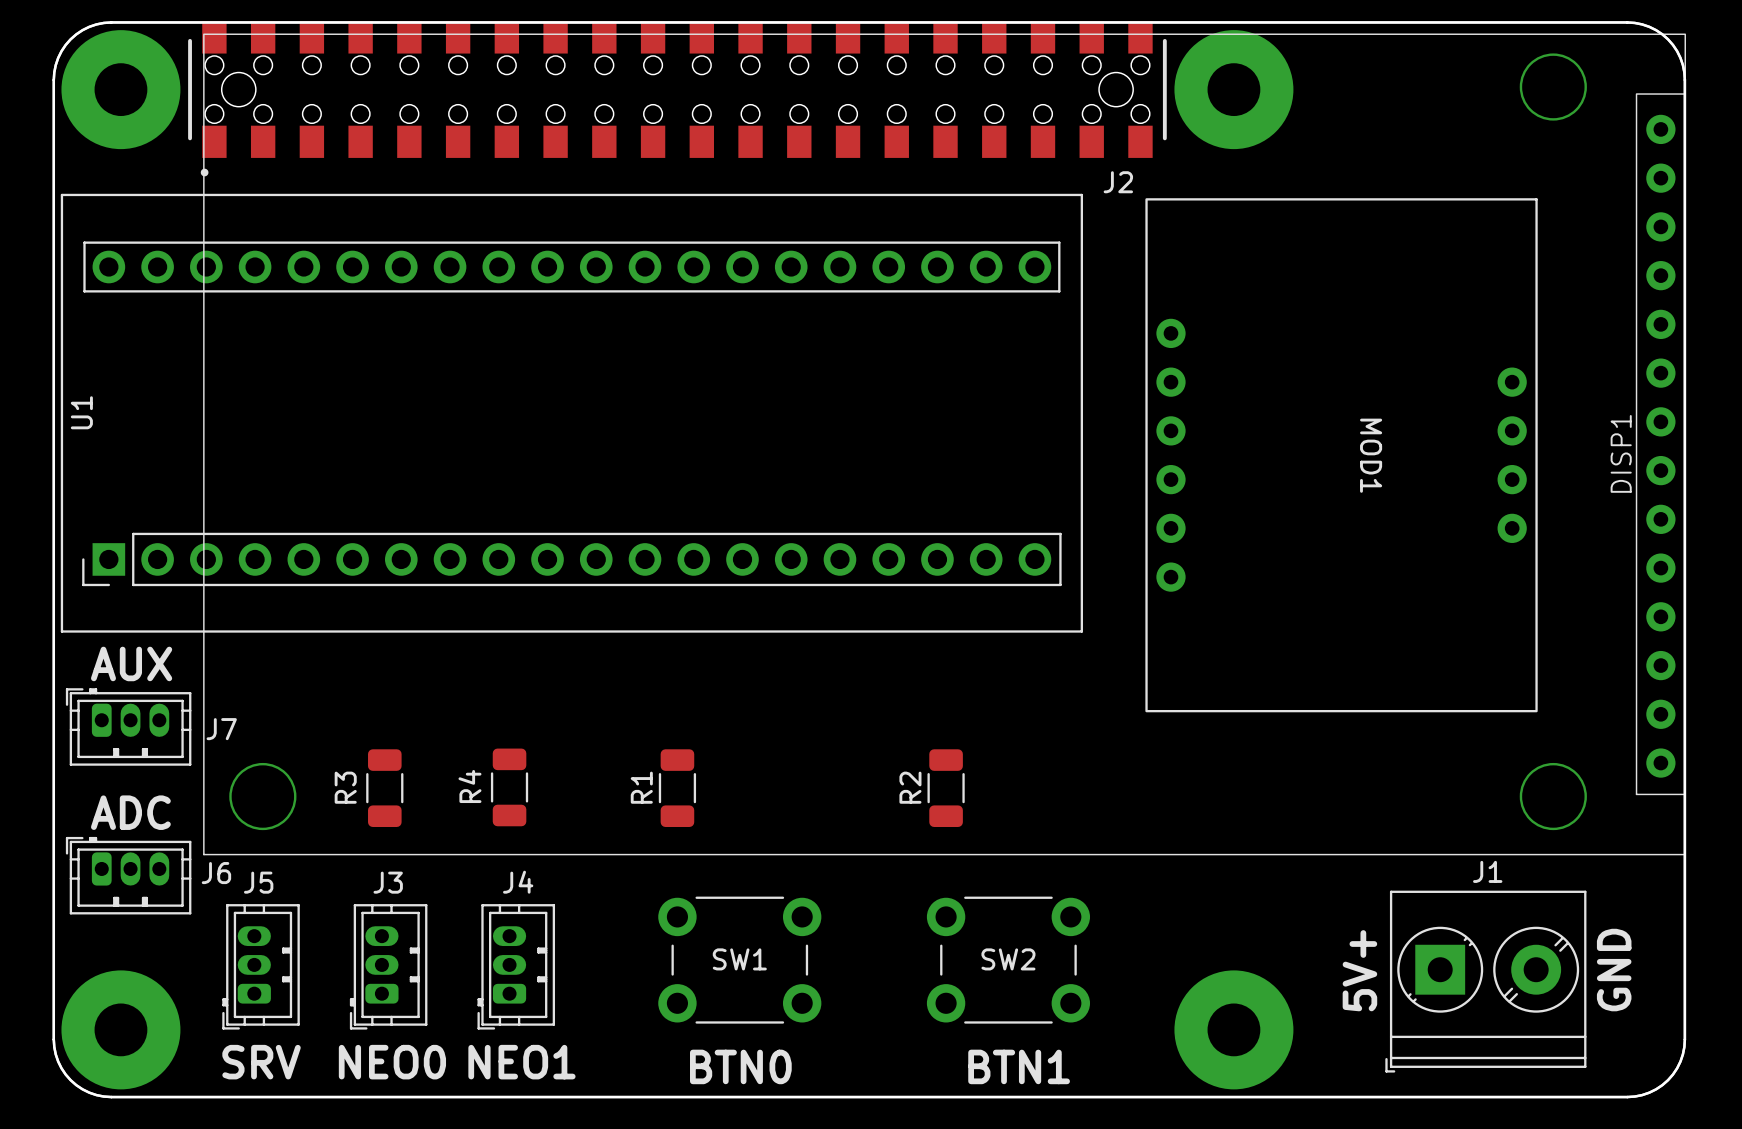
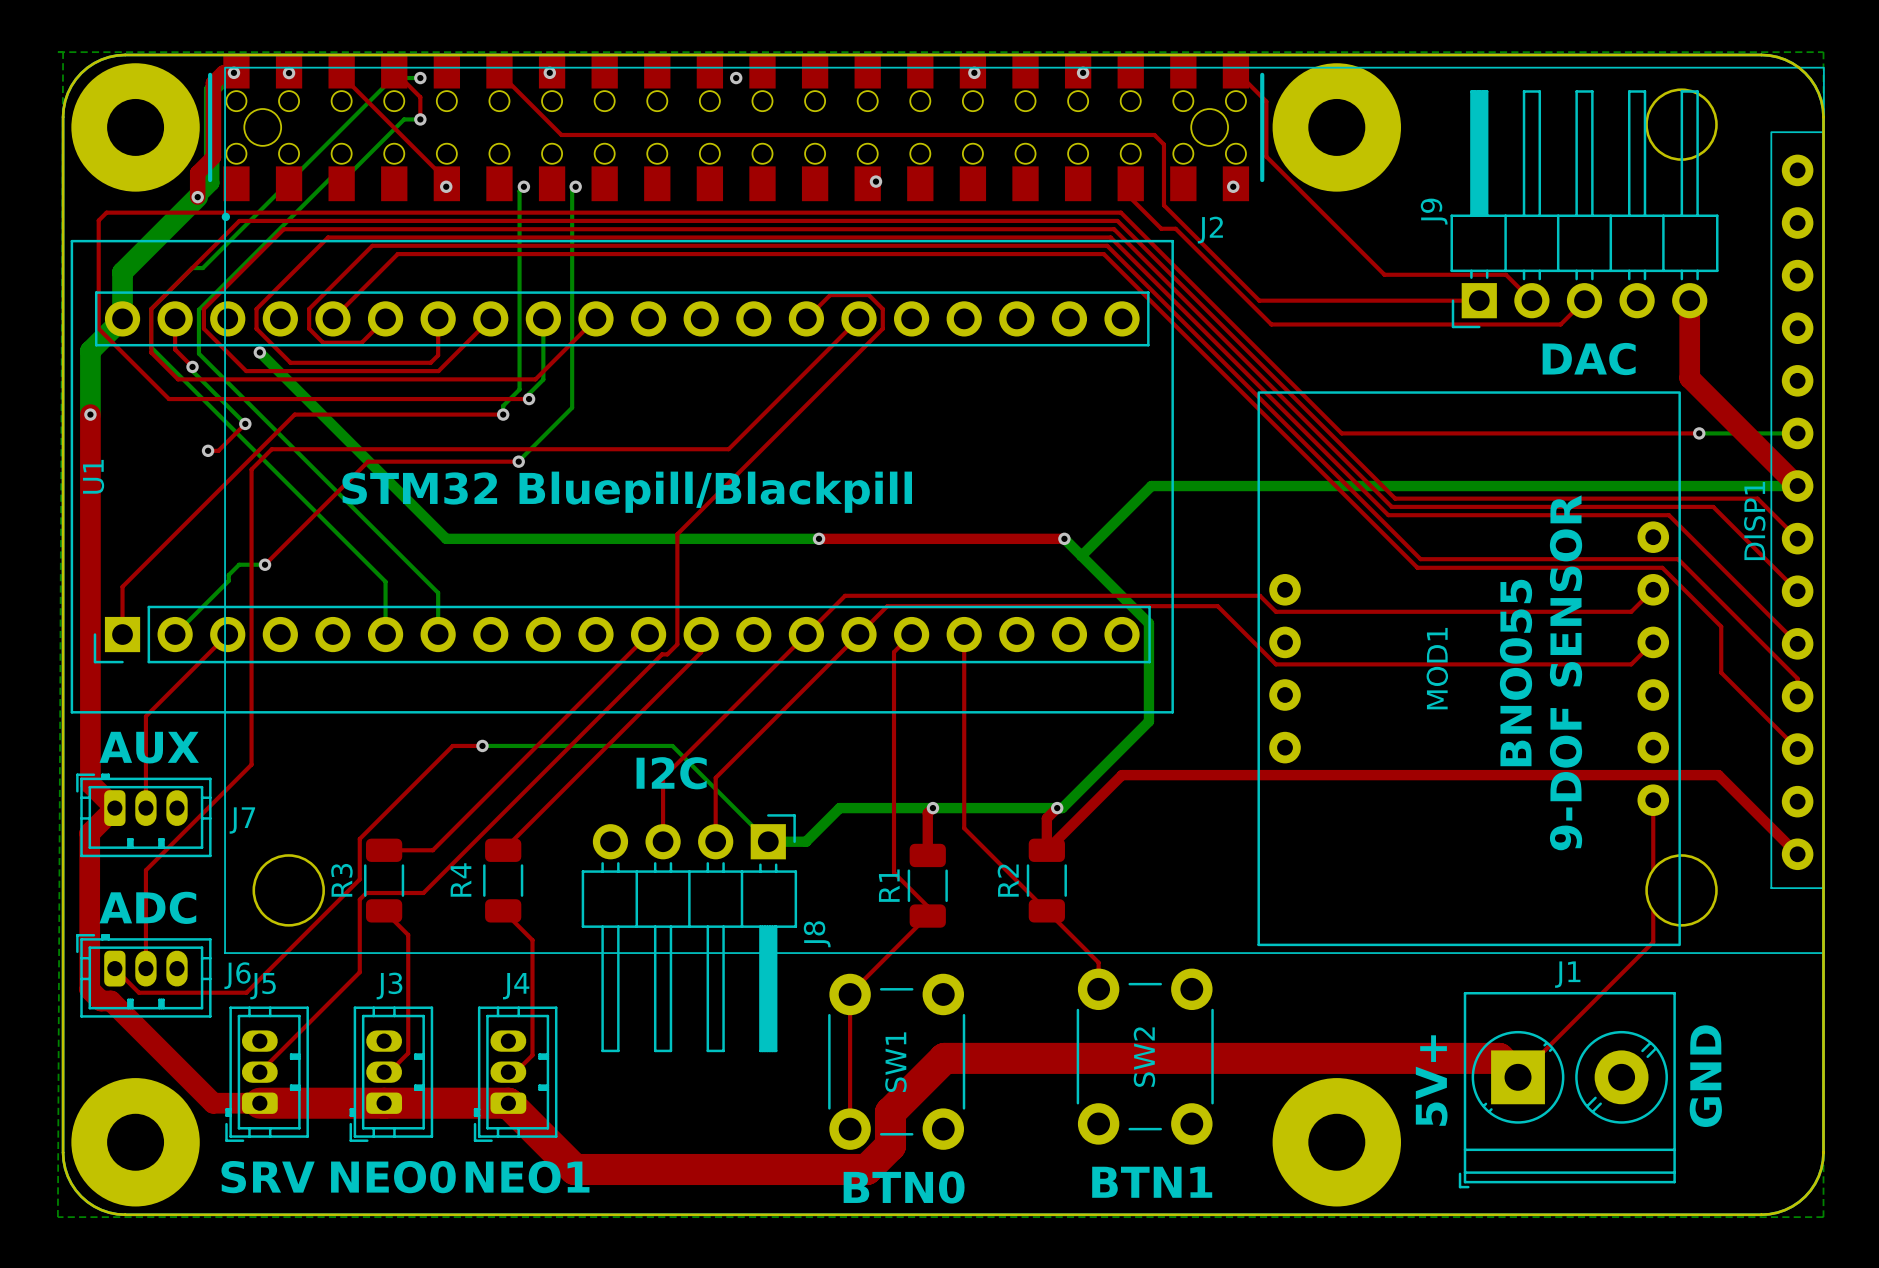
bottom zone outline: none -> (57, 52) (1823, 52) (1823, 1217) (57, 1217) (63, 52)
top track: none -> (341, 71) (341, 75) (446, 180) (446, 183)
top track: none -> (394, 71) (420, 97) (420, 119)
top track: none -> (499, 71) (561, 134) (1154, 134) (1163, 144) (1163, 205) (1259, 300) (1479, 300)
top track: none -> (1235, 71) (1266, 101) (1266, 156) (1384, 274) (1506, 274) (1531, 300)
bottom track: none -> (233, 73) (223, 73) (223, 78) (211, 90) (211, 183) (122, 272) (122, 318) (90, 351) (90, 414)
top track: none -> (233, 73) (223, 73) (213, 83) (213, 157) (197, 172) (197, 197)
via: none -> (233, 72)
via: none -> (289, 73)
via: none -> (549, 72)
via: none -> (974, 72)
via: none -> (1083, 72)
bottom track: none -> (420, 78) (392, 78) (202, 268) (192, 268) (151, 309) (151, 347) (385, 581) (385, 634)
via: none -> (420, 78)
via: none -> (736, 78)
bottom track: none -> (420, 119) (404, 119) (352, 171) (337, 171) (198, 309) (198, 353) (438, 592) (438, 634)
via: none -> (420, 119)
via: none -> (875, 181)
top track: none -> (1130, 183) (1130, 198) (1161, 228) (1175, 228) (1271, 324) (1560, 324) (1584, 300)
via: none -> (446, 186)
bottom track: none -> (523, 186) (519, 191) (519, 389) (503, 405) (503, 414)
via: none -> (523, 186)
bottom track: none -> (575, 186) (572, 190) (572, 407) (518, 461)
via: none -> (575, 186)
via: none -> (1233, 186)
via: none -> (197, 197)
J9: none -> (1584, 209)
top track: none -> (1689, 300) (1689, 378) (1797, 486)
top track: none -> (175, 318) (175, 349) (192, 366)
top track: none -> (332, 318) (397, 254) (1103, 254) (1417, 567) (1662, 567) (1721, 626) (1721, 672) (1797, 749)
top track: none -> (385, 318) (361, 342) (323, 342) (309, 328) (309, 309) (372, 245) (1107, 245) (1420, 559) (1678, 559) (1797, 678) (1797, 696)
top track: none -> (438, 318) (438, 355) (430, 362) (290, 362) (256, 328) (256, 309) (328, 237) (1110, 237) (1388, 515) (1668, 515) (1797, 643)
top track: none -> (490, 318) (438, 371) (246, 371) (203, 328) (203, 309) (283, 229) (1114, 229) (1391, 506) (1713, 506) (1797, 591)
bottom track: none -> (543, 318) (543, 379) (529, 393) (529, 399)
top track: none -> (595, 318) (535, 379) (178, 379) (151, 352) (151, 309) (239, 220) (1117, 220) (1395, 498) (1757, 498) (1797, 538)
top track: none -> (806, 318) (830, 295) (868, 295) (882, 309) (882, 328) (677, 534) (677, 644) (667, 654) (662, 654) (423, 893) (366, 893) (359, 899) (359, 972) (259, 1072)
top track: none -> (859, 318) (728, 449) (271, 449) (251, 469) (251, 764) (145, 870) (145, 968)
bottom track: none -> (259, 352) (446, 538) (819, 538)
via: none -> (259, 352)
text: none -> DAC (1589, 359)
bottom track: none -> (192, 366) (192, 371) (245, 423)
via: none -> (192, 366)
top track: none -> (529, 399) (168, 399) (98, 328) (98, 220) (106, 212) (1120, 212) (1341, 433) (1699, 433)
via: none -> (529, 399)
top track: none -> (90, 414) (90, 783) (114, 808) (89, 833) (89, 989) (101, 1001) (111, 1001) (213, 1103) (508, 1103) (574, 1169) (866, 1169) (890, 1145) (890, 1112) (944, 1058) (1499, 1058) (1518, 1077) (1653, 942) (1653, 800)
via: none -> (90, 414)
top track: none -> (503, 414) (294, 414) (122, 586) (122, 634)
via: none -> (503, 414)
top track: none -> (245, 423) (218, 450) (208, 450)
via: none -> (245, 423)
bottom track: none -> (1699, 433) (1797, 433)
via: none -> (1699, 433)
via: none -> (208, 450)
top track: none -> (518, 461) (368, 461) (265, 564)
via: none -> (518, 461)
bottom track: none -> (1797, 486) (1151, 486) (1081, 555)
text: none -> STM32 Bluepill/Blackpill (627, 492)
MOD1 rotation: 0° (1341, 455) -> 180° (1469, 668)
top track: none -> (819, 538) (1064, 538)
via: none -> (819, 538)
bottom track: none -> (1064, 538) (1148, 623) (1148, 721) (1062, 808) (839, 808) (806, 841) (768, 841) (672, 745) (482, 745)
via: none -> (1064, 538)
bottom track: none -> (265, 564) (239, 564) (228, 575) (228, 580) (175, 634)
via: none -> (265, 564)
top track: none -> (1653, 589) (1631, 611) (1275, 611) (1259, 595) (845, 595) (663, 777) (663, 841)
top track: none -> (227, 634) (145, 716) (145, 808)
top track: none -> (648, 634) (432, 850) (384, 850)
top track: none -> (701, 634) (701, 652) (503, 850)
top track: none -> (911, 634) (894, 652) (894, 872) (927, 906) (927, 916) (850, 993) (850, 1129)
top track: none -> (964, 634) (964, 828) (1098, 962) (1098, 989)
top track: none -> (1653, 642) (1631, 664) (1275, 664) (1217, 606) (887, 606) (715, 777) (715, 841)
text: none -> BNO055 (1516, 673)
text: none -> 9-DOF SENSOR (1566, 672)
top track: none -> (482, 745) (452, 745) (359, 838) (359, 879) (246, 992) (138, 992) (114, 968)
via: none -> (482, 745)
text: none -> I2C (671, 773)
top track: none -> (932, 808) (927, 813) (927, 855)
via: none -> (932, 808)
top track: none -> (1057, 808) (1046, 818) (1046, 850) (1122, 775) (1718, 775) (1797, 854)
via: none -> (1057, 808)
R4 position: (509, 787) -> (503, 880)
R3 position: (384, 788) -> (384, 880)
R1 position: (677, 788) -> (927, 885)
R2 position: (946, 788) -> (1046, 880)
top track: none -> (384, 910) (408, 934) (408, 1053) (389, 1072) (384, 1072)
top track: none -> (503, 910) (532, 940) (532, 1055) (515, 1072) (508, 1072)
J8: none -> (689, 933)
SW1 rotation: 0° (739, 960) -> 90° clockwise (896, 1061)
SW2 rotation: 0° (1008, 960) -> 90° clockwise (1145, 1056)
J5 position: (261, 966) -> (267, 1074)
J3 position: (388, 966) -> (391, 1074)
J4 position: (516, 966) -> (515, 1074)
text position: 5V+ (1359, 970) -> 5V+ (1431, 1080)
text position: GND (1614, 970) -> GND (1705, 1076)
J1 position: (1485, 981) -> (1567, 1090)
text position: SRV (261, 1062) -> SRV (268, 1177)
text position: NEO0 (392, 1062) -> NEO0 (393, 1177)
text position: NEO1 (521, 1062) -> NEO1 (527, 1177)
text position: BTN0 (740, 1066) -> BTN0 (904, 1187)
text position: BTN1 (1019, 1066) -> BTN1 (1152, 1182)

